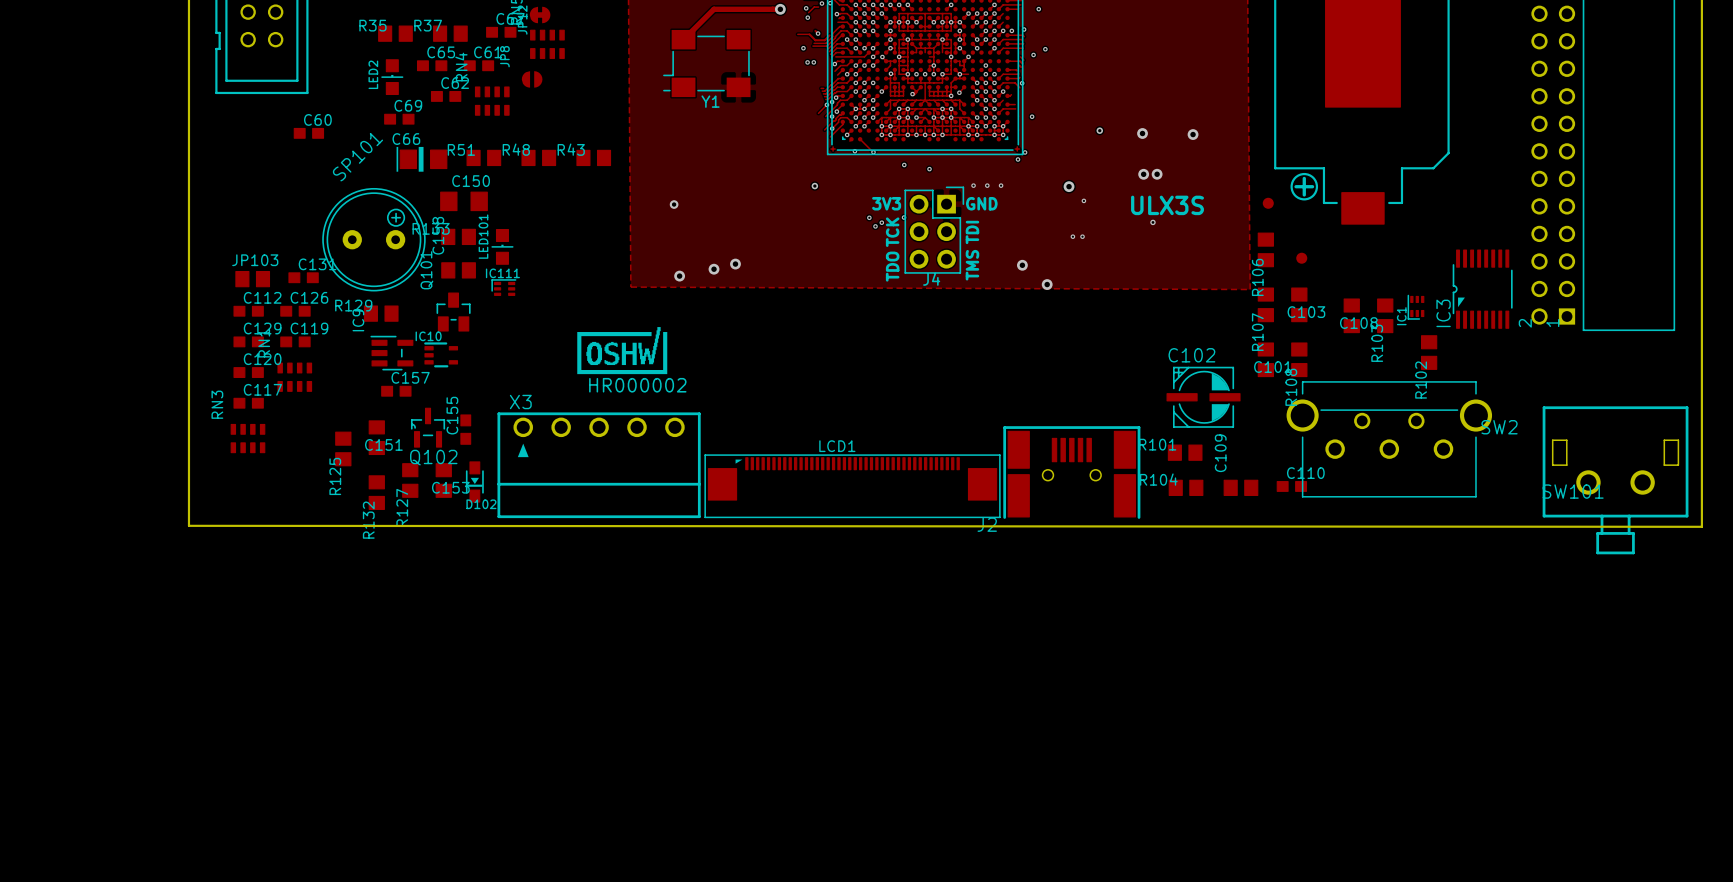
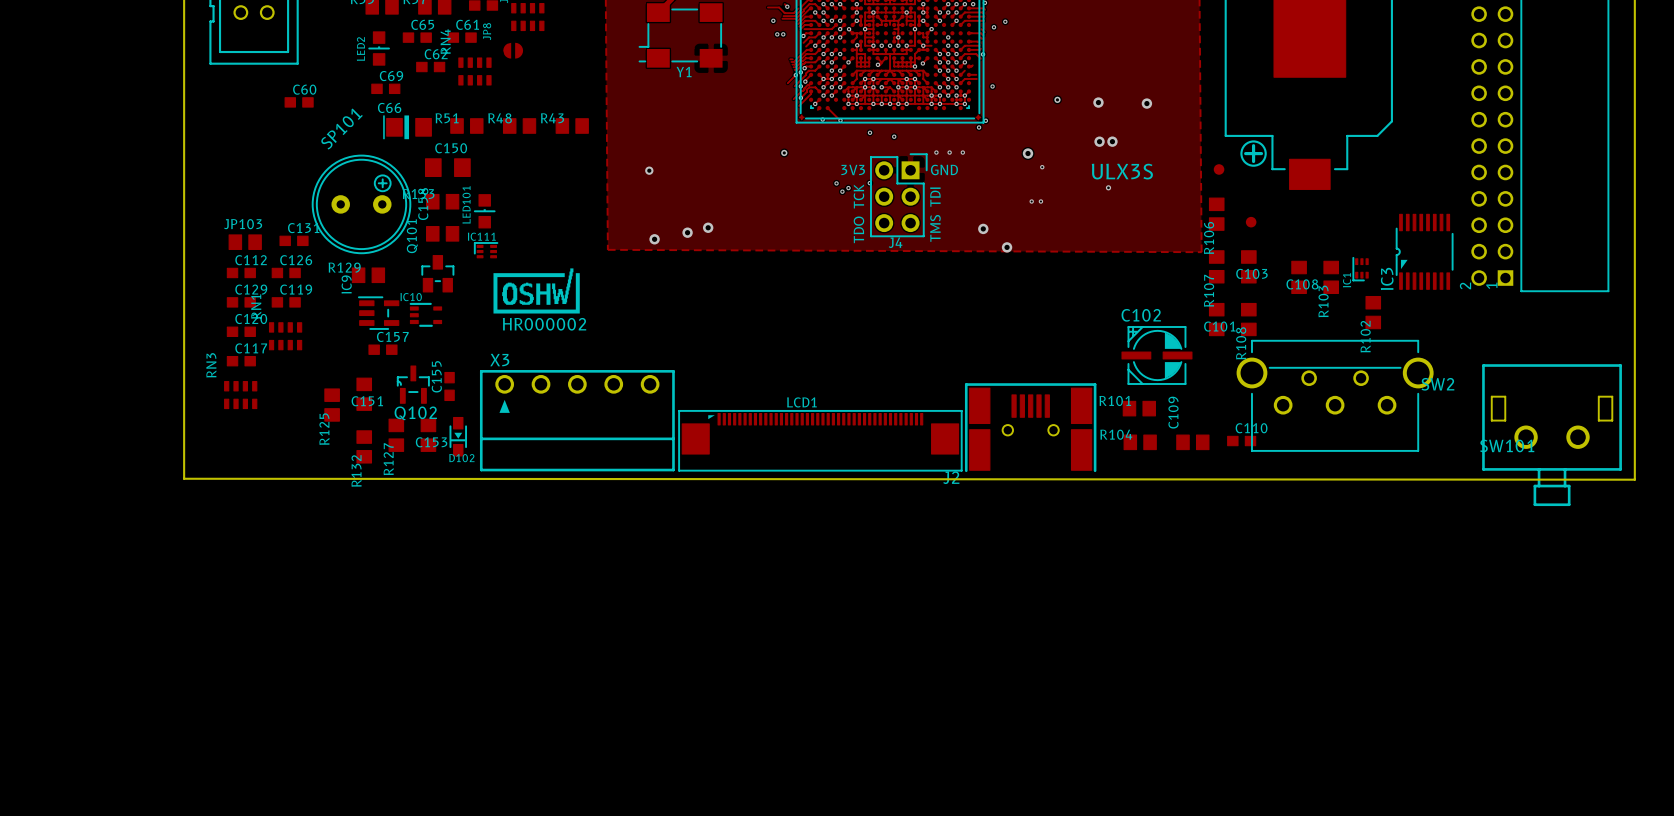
drawing position: (622, 350) -> (536, 290)

